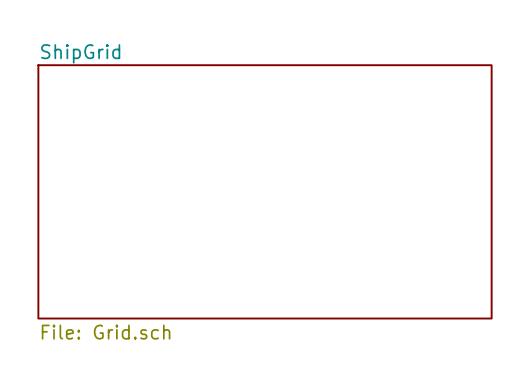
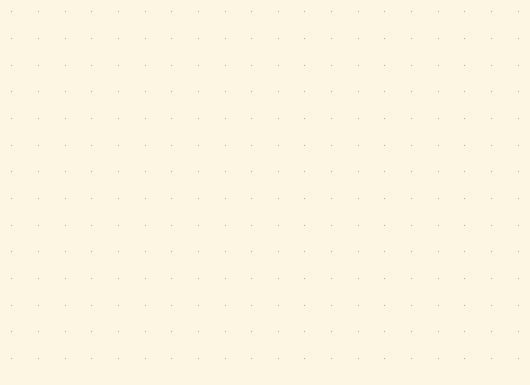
sheet ShipGrid: File: Grid.sch (265, 191) -> none

